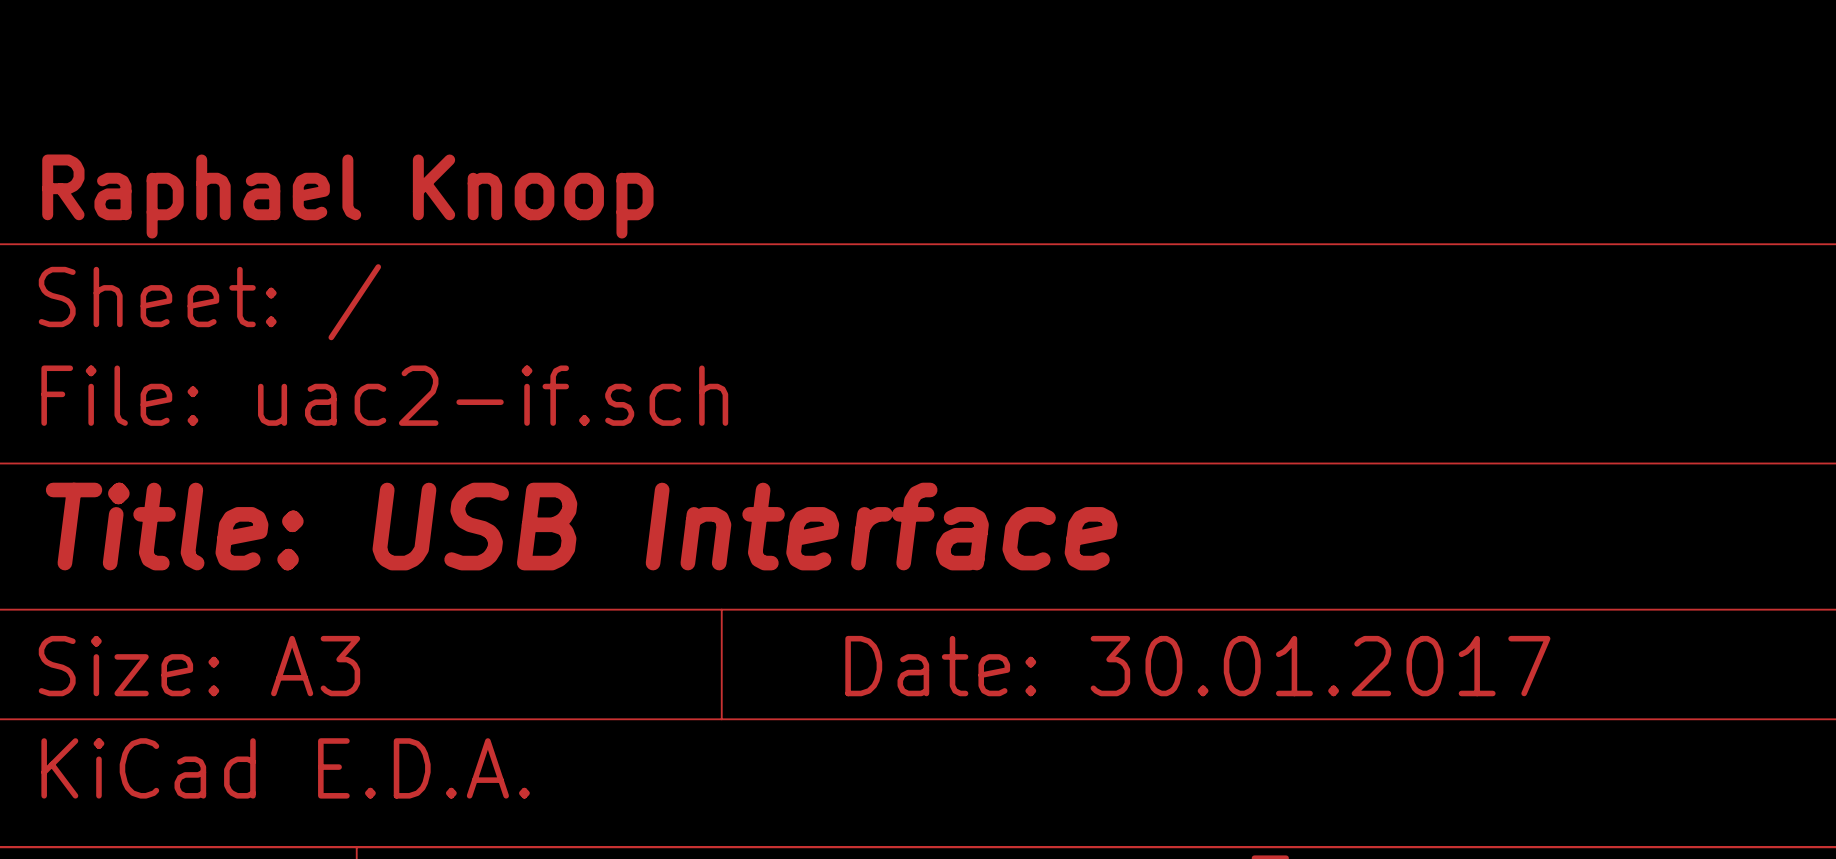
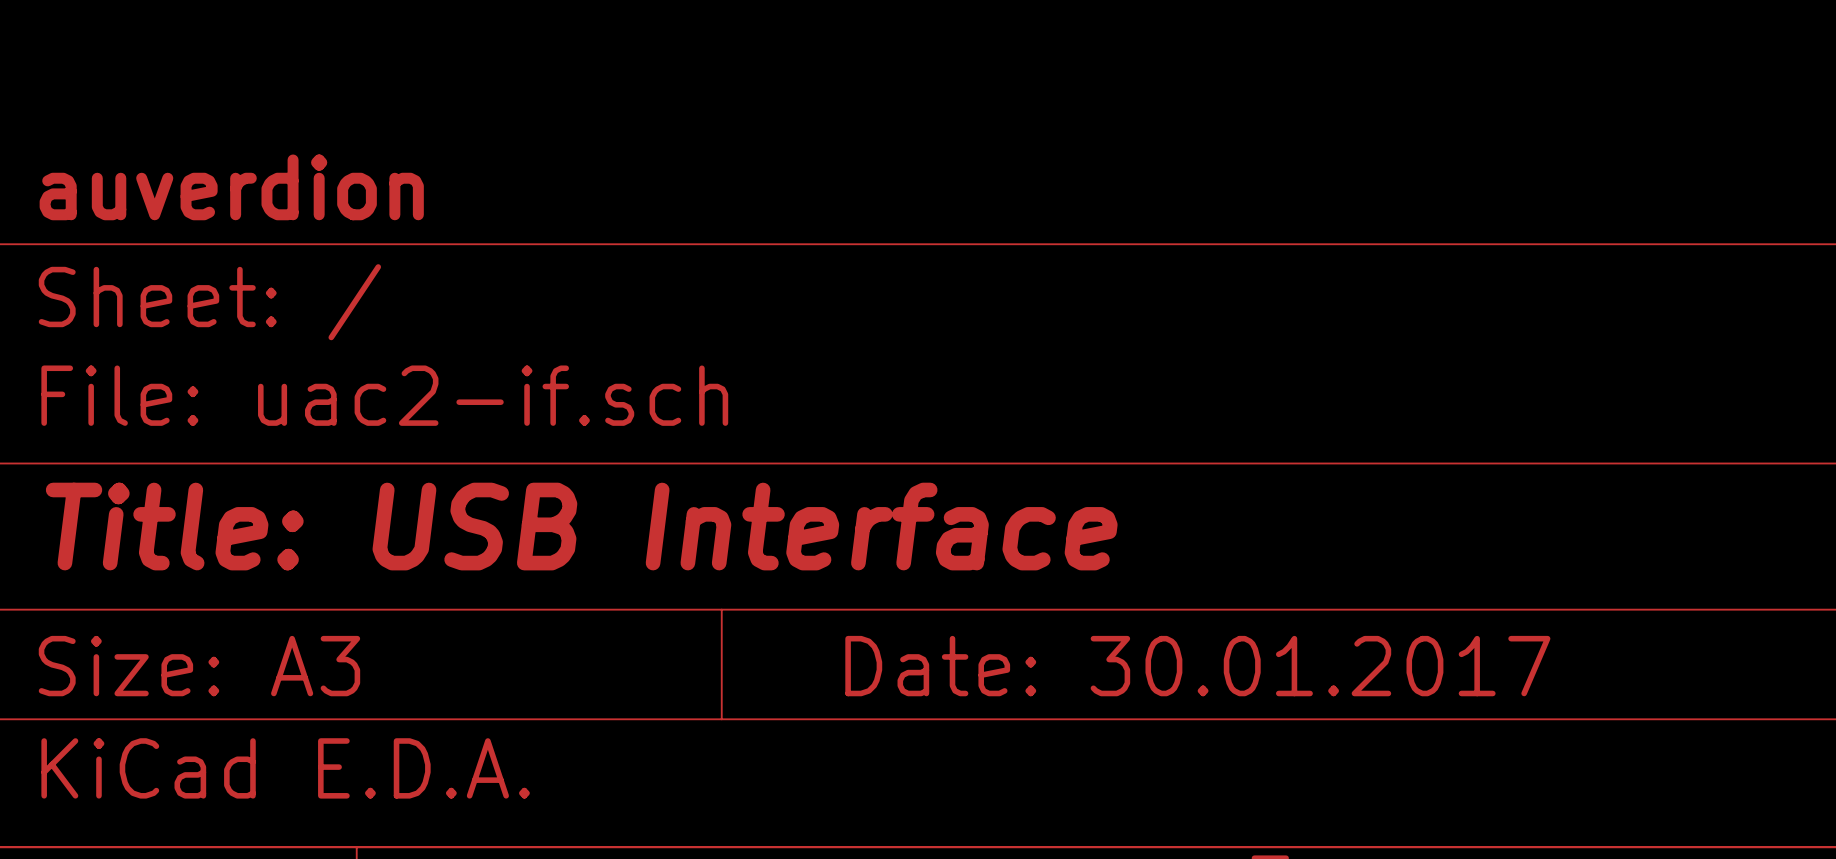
title block: Raphael Knoop (347, 196) -> auverdion (231, 187)

